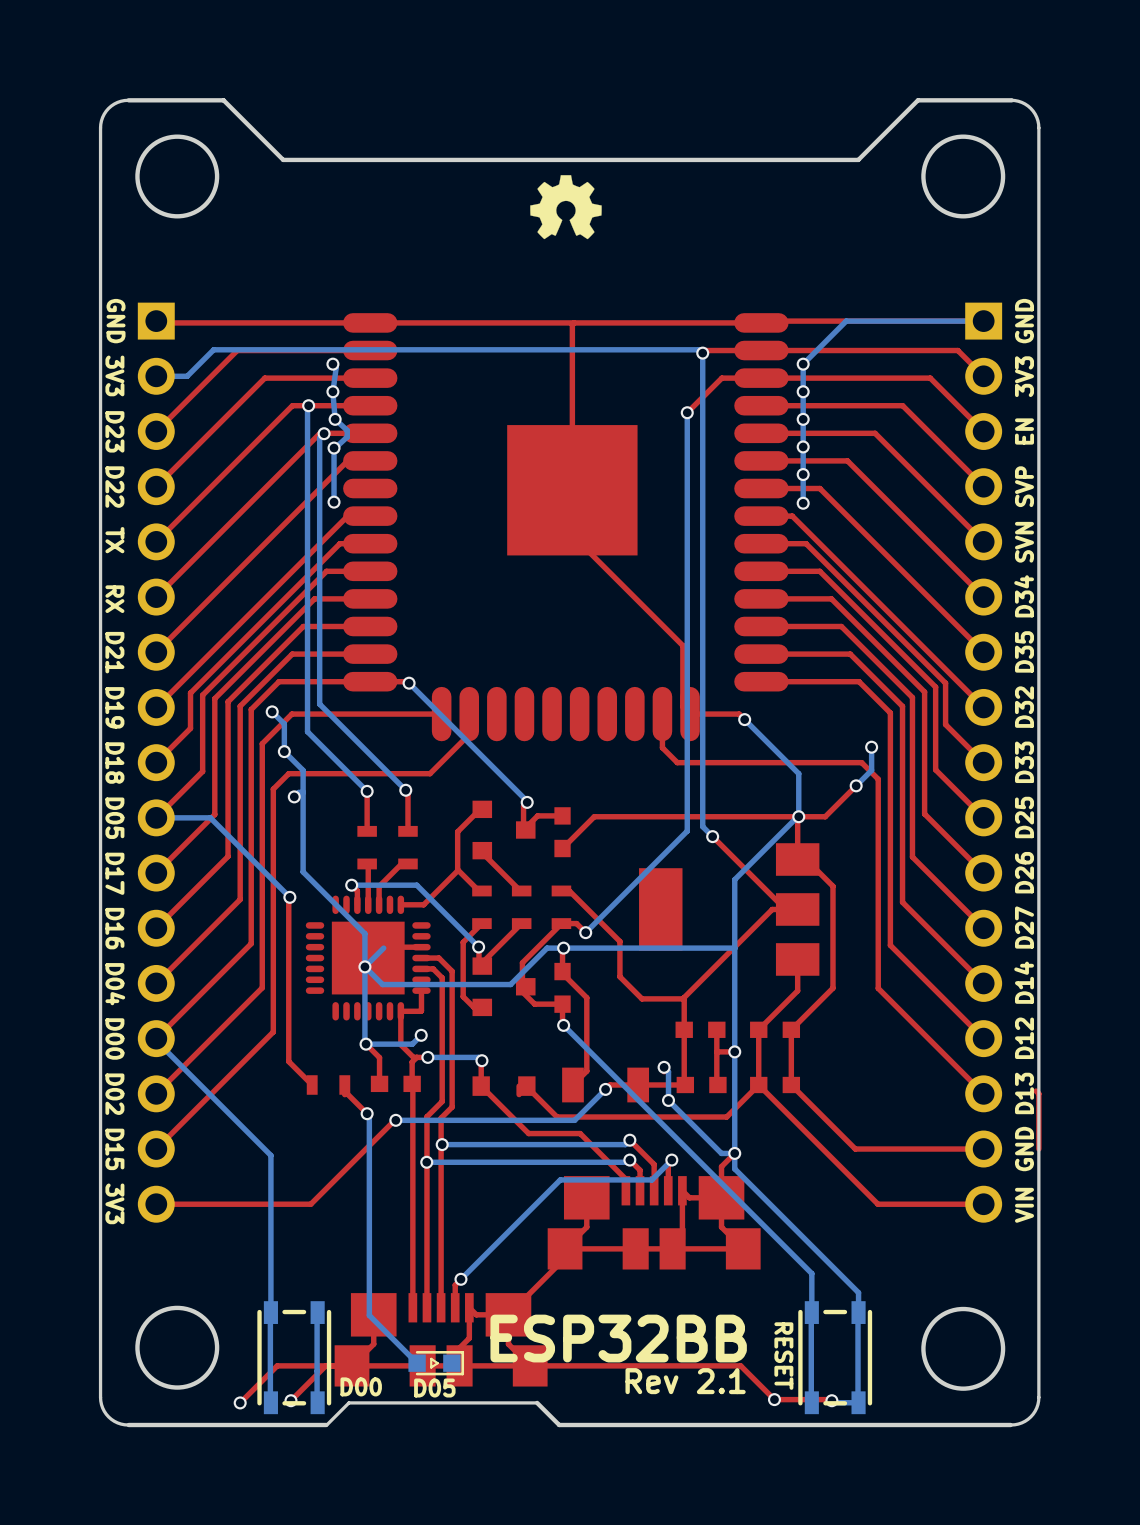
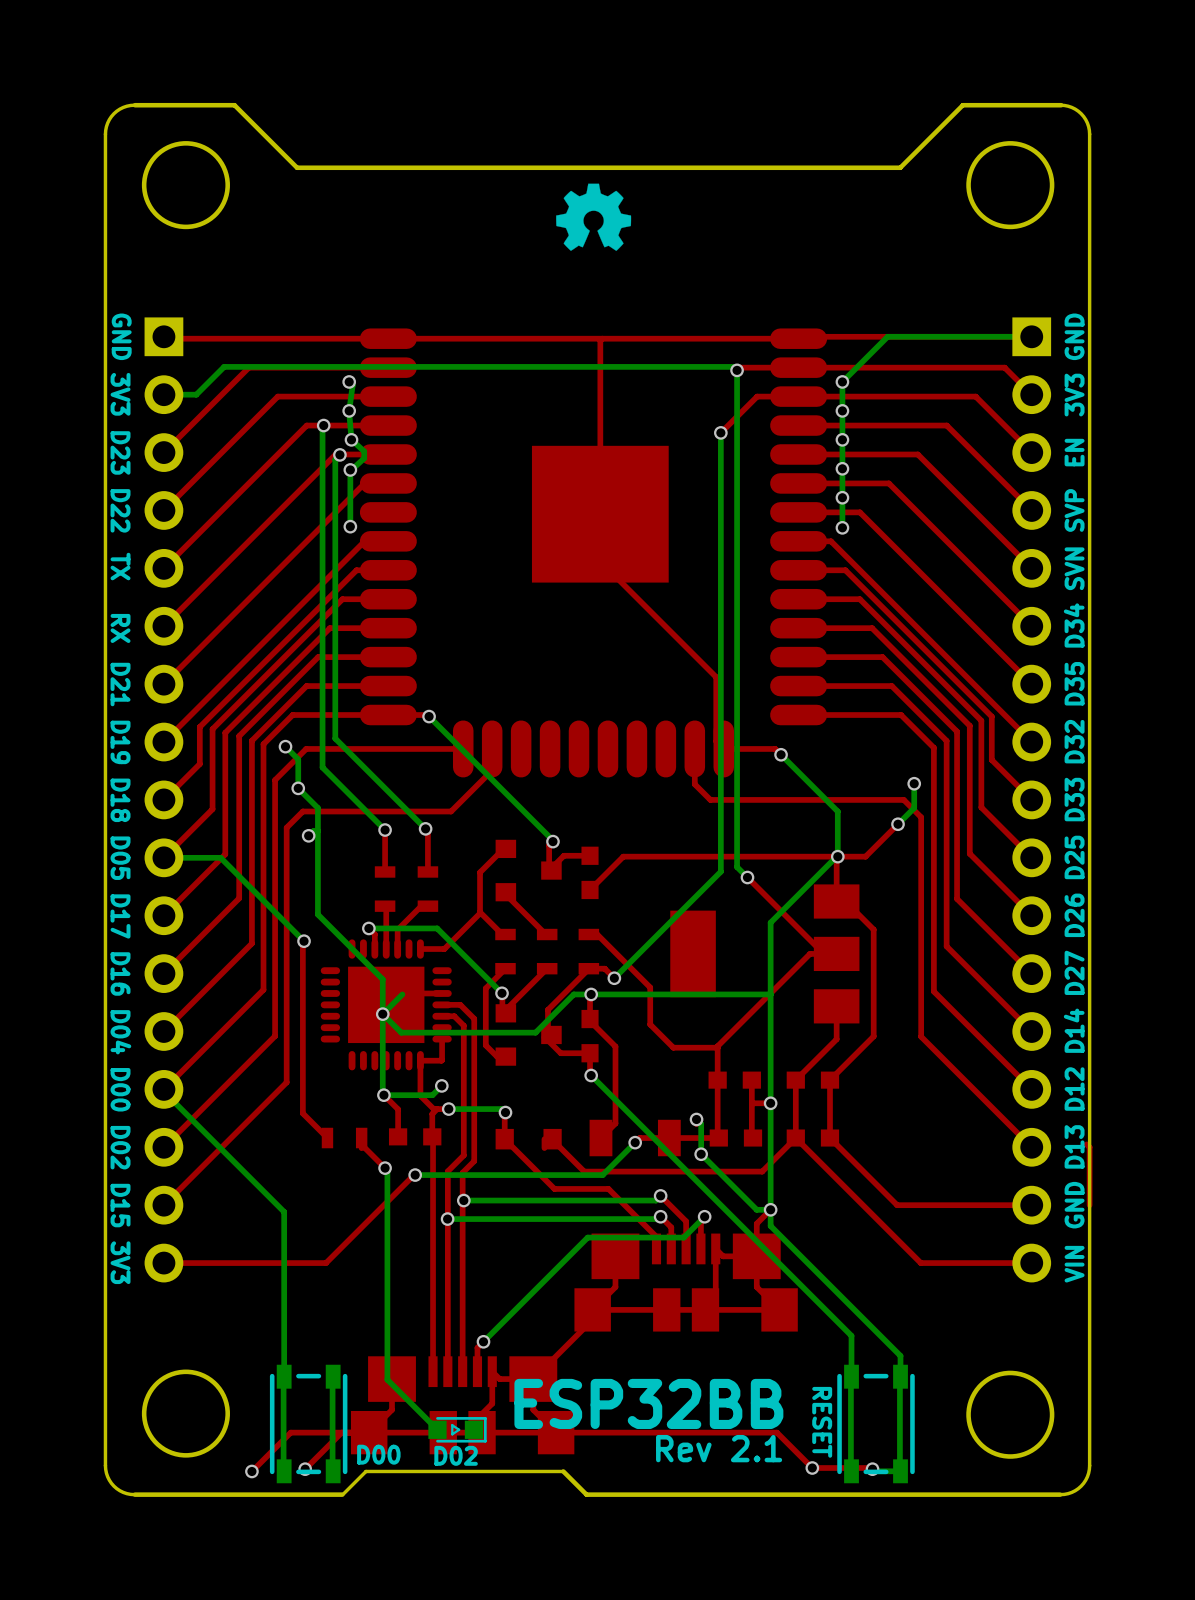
part value: D05 (434, 1388) -> D02 (456, 1455)

